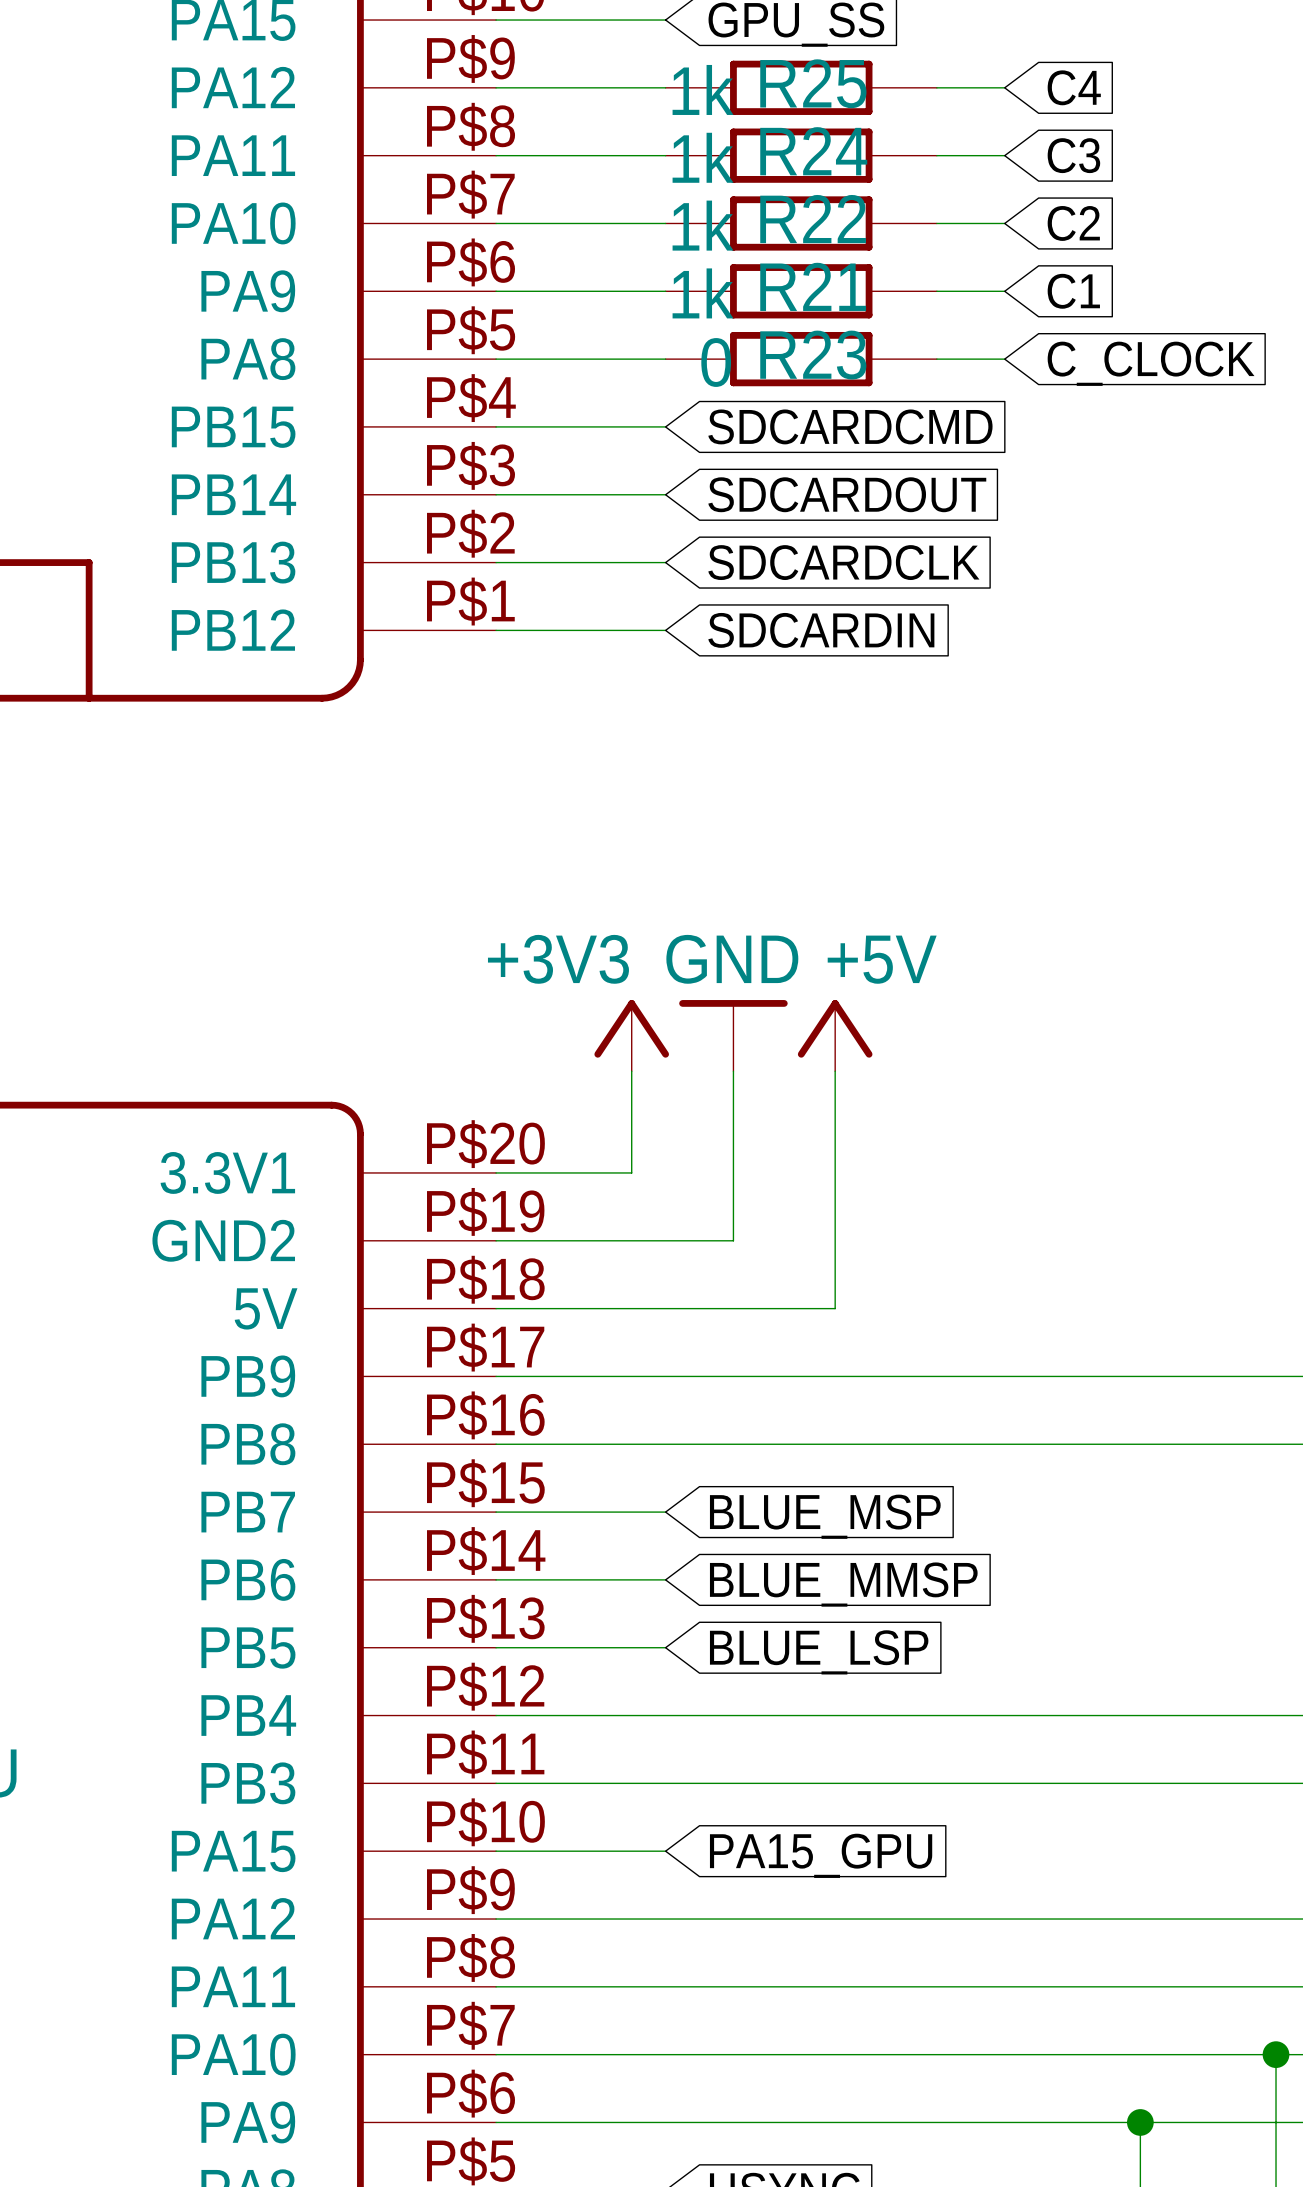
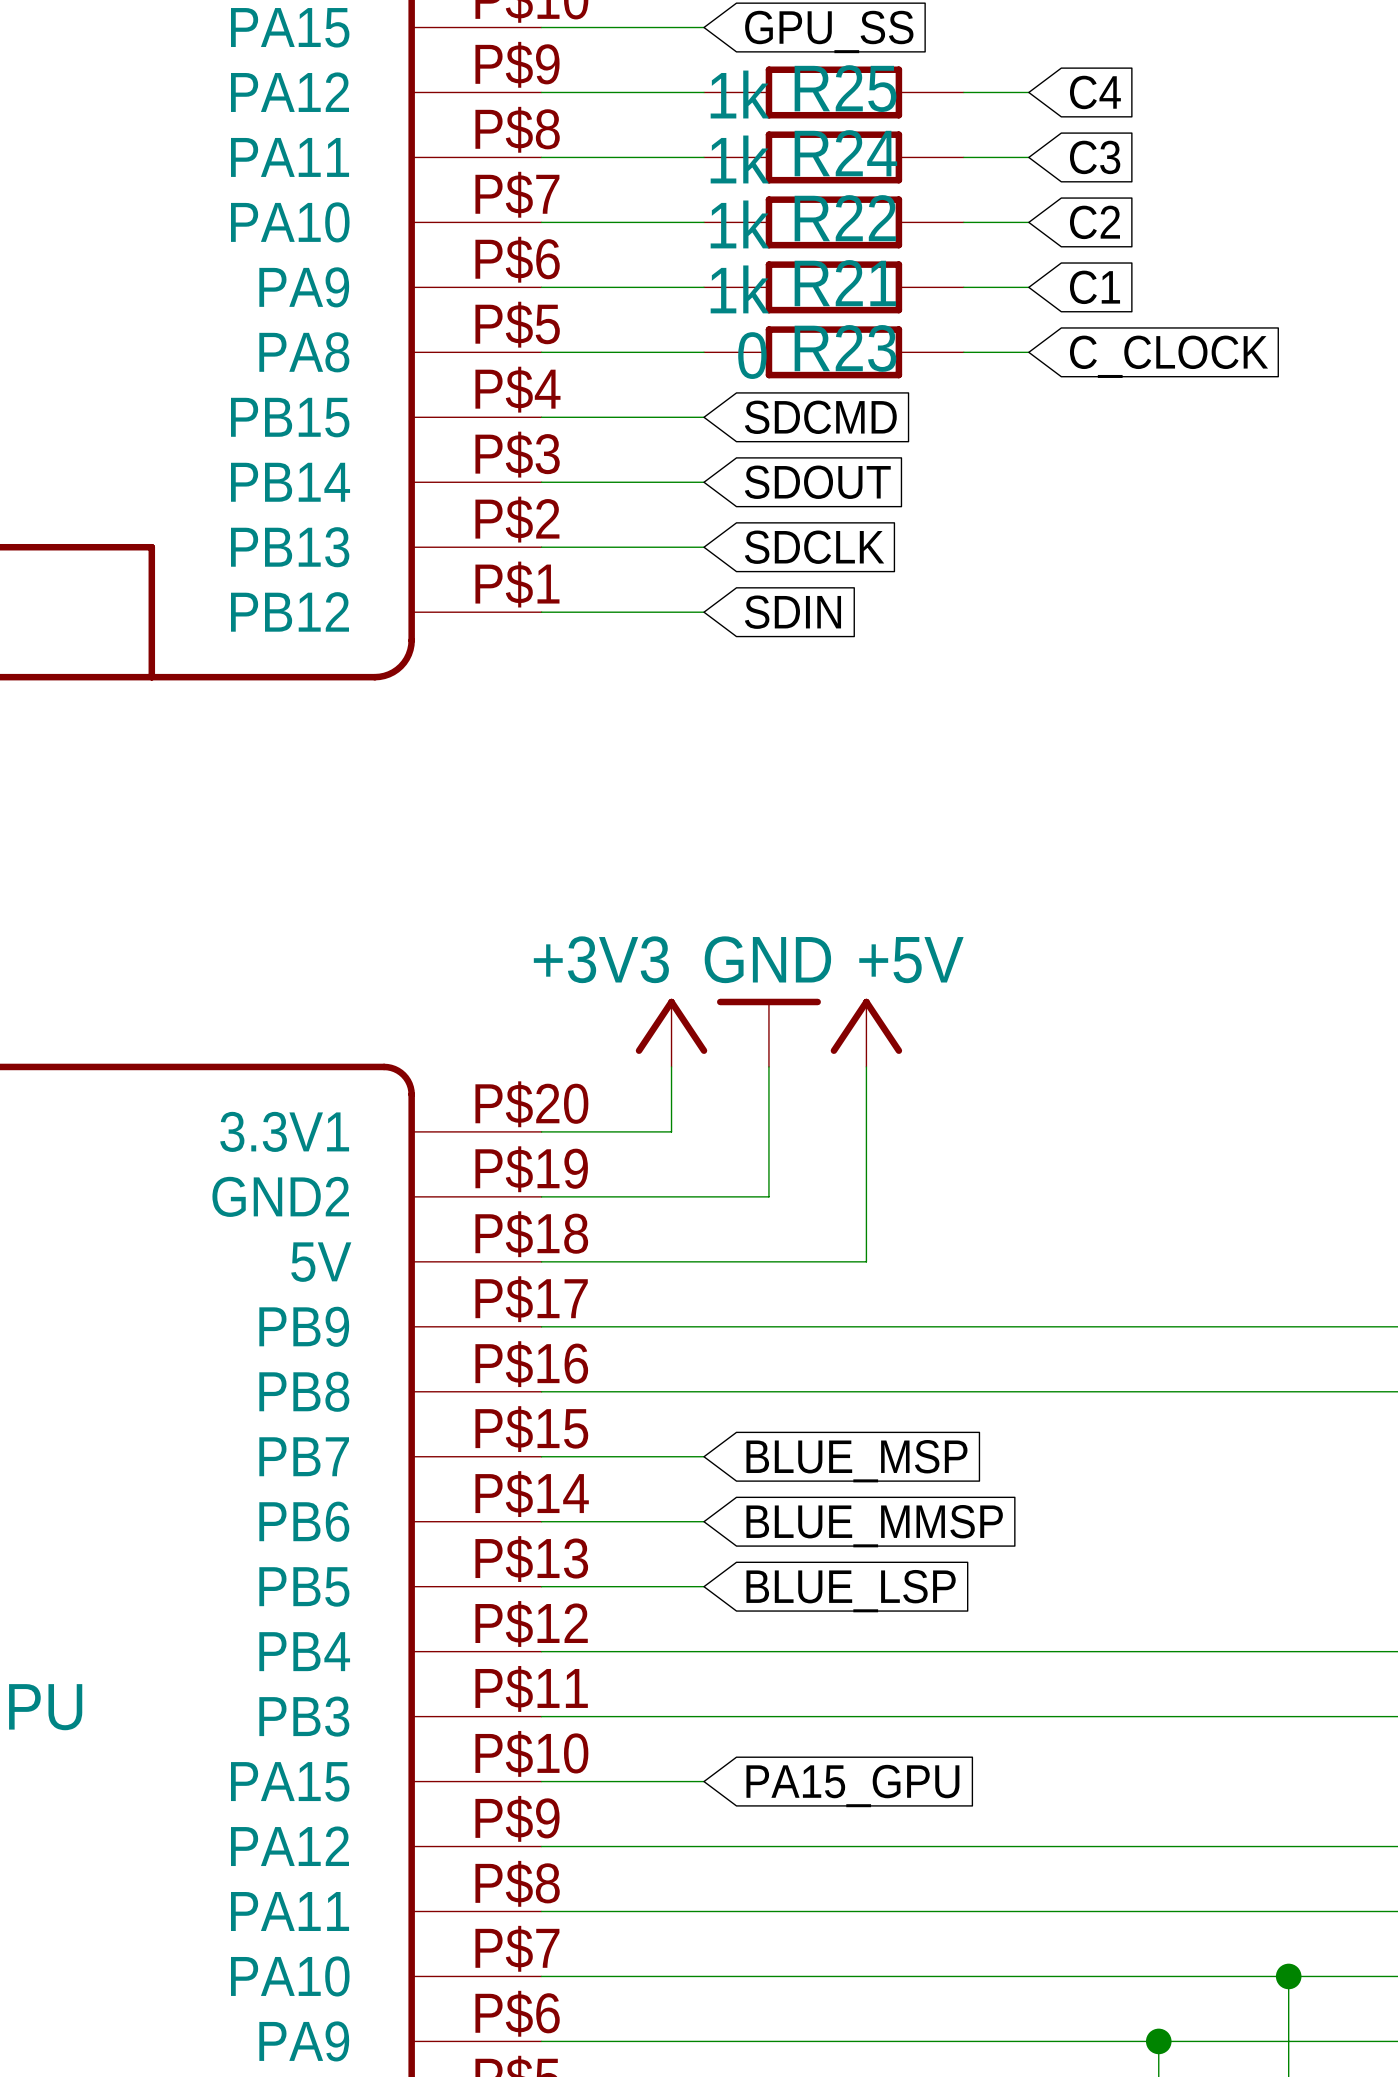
global label: SDCARDCMD (850, 426) -> SDCMD (820, 417)
global label: SDCARDOUT (847, 494) -> SDOUT (817, 482)
global label: SDCARDCLK (843, 562) -> SDCLK (814, 547)
global label: SDCARDIN (821, 630) -> SDIN (792, 612)
power symbol position: +3V3 (631, 1035) -> +3V3 (671, 1032)
power symbol position: GND (733, 1035) -> GND (768, 1032)
power symbol position: +5V (835, 1035) -> +5V (866, 1032)

